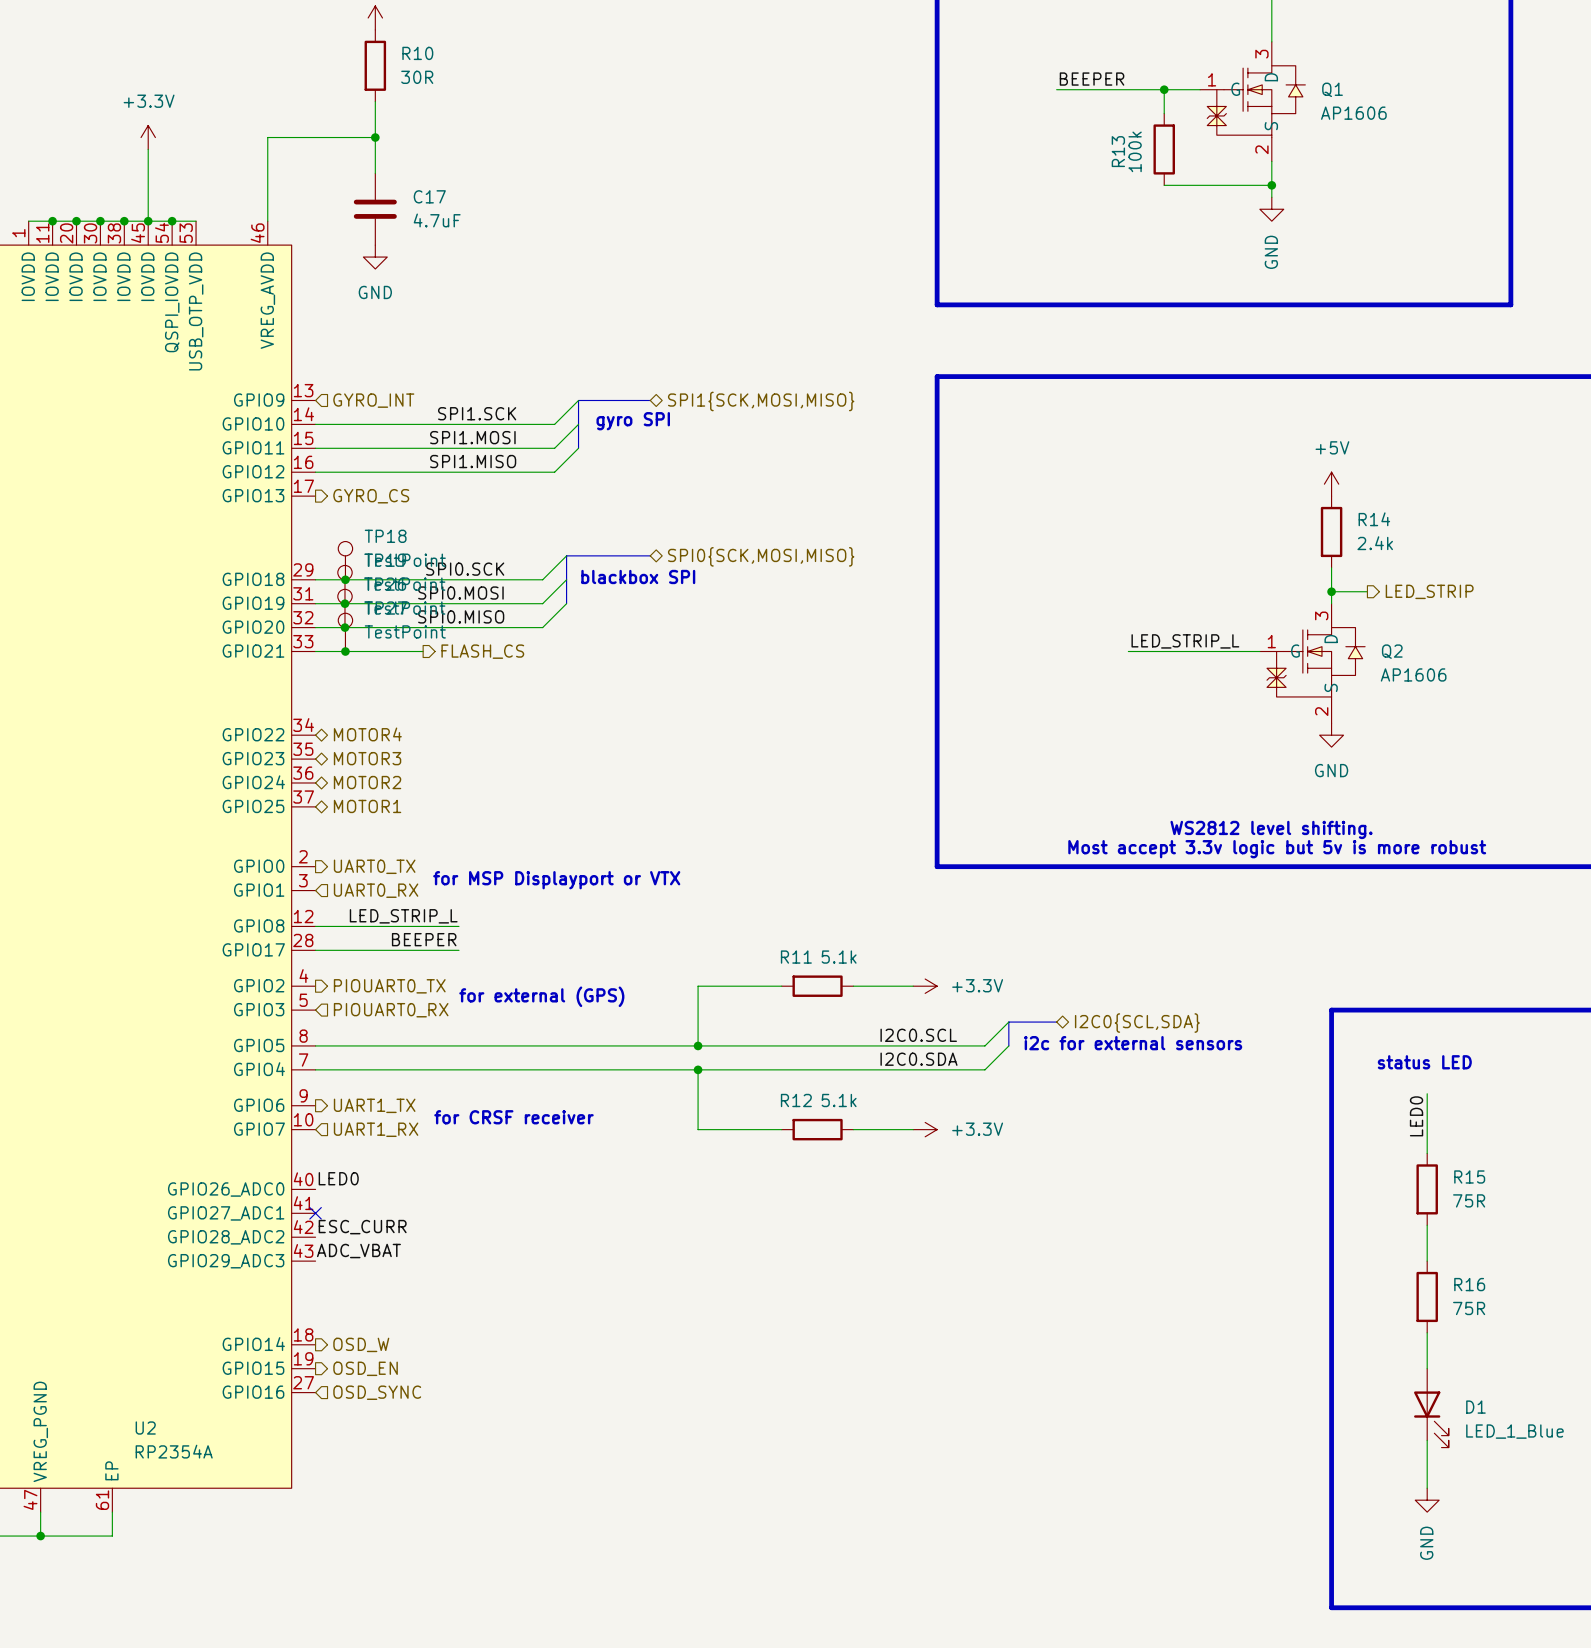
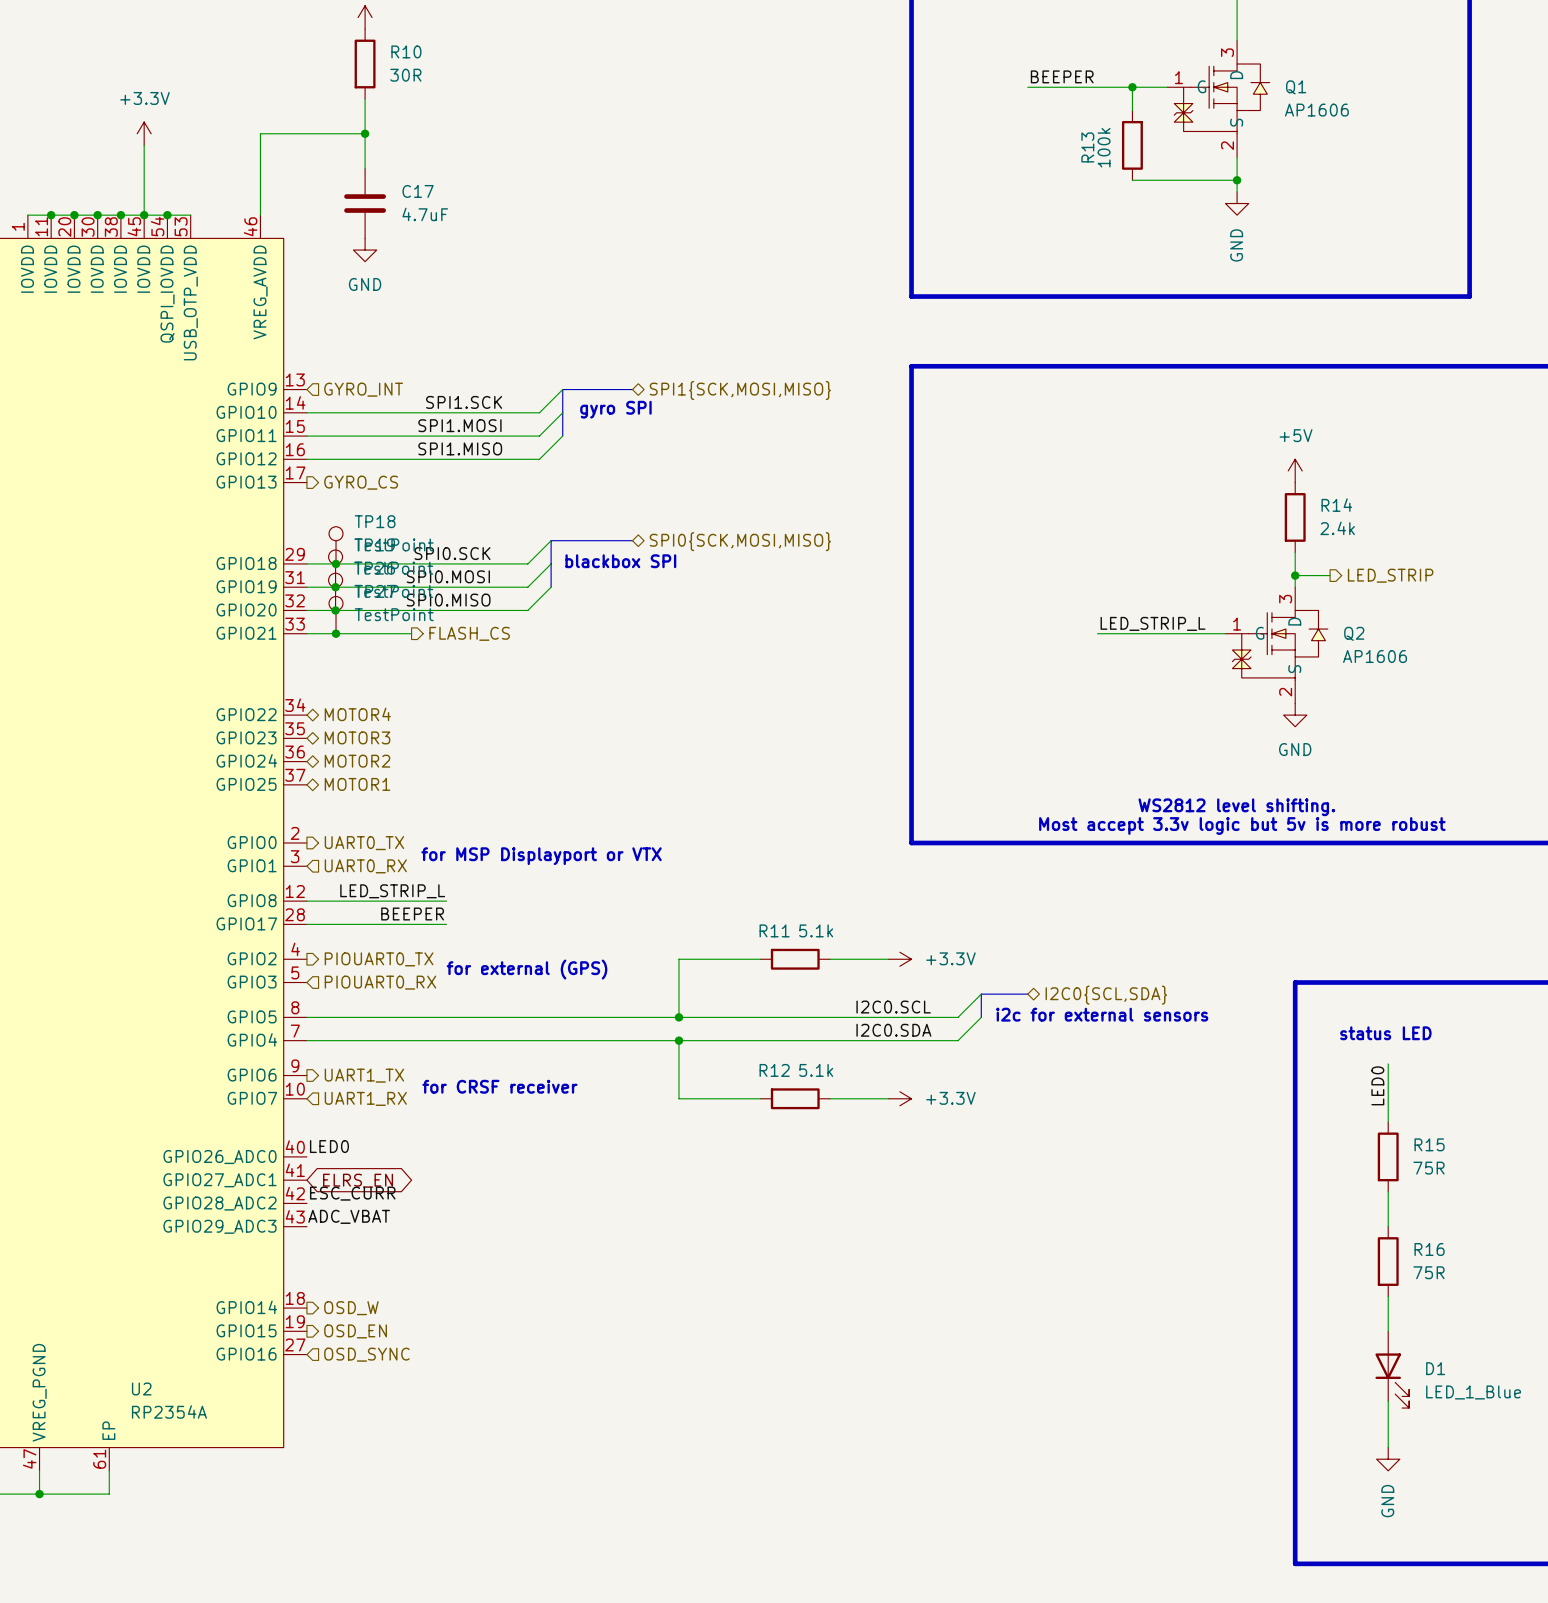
no-connect mark: (315, 1213) -> none
global label: none -> ELRS_EN (358, 1180)

